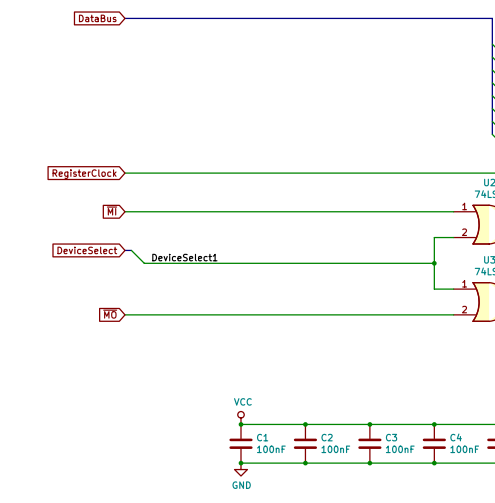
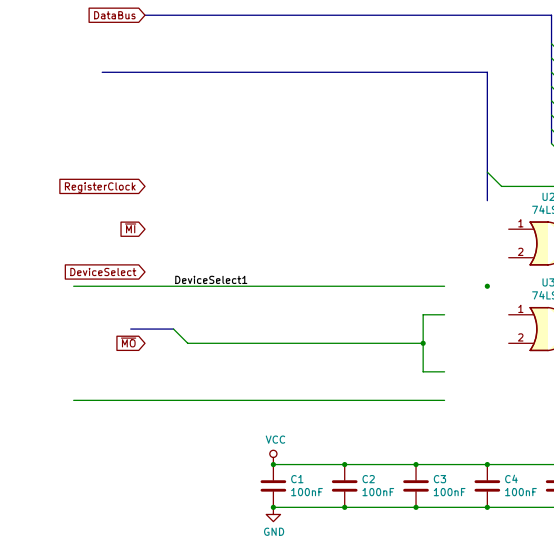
bus: none -> (102, 72) (487, 72) (487, 200)
wire: (124, 173) (447, 173) -> (487, 172) (501, 186)
wire: (124, 211) (453, 211) -> none
wire: (453, 237) (434, 237) (434, 289) (453, 289) -> (444, 314) (423, 314) (423, 371) (444, 371)
bus: (124, 250) (131, 250) -> none
wire: (131, 250) (144, 263) -> (73, 286) (166, 286)
wire: (395, 263) (434, 263) -> none
bus: none -> (130, 329) (173, 329)
wire: (124, 314) (163, 314) -> (173, 329) (187, 343)
wire: (376, 314) (453, 314) -> none
junction: none -> (423, 343)
wire: none -> (73, 400) (444, 400)

